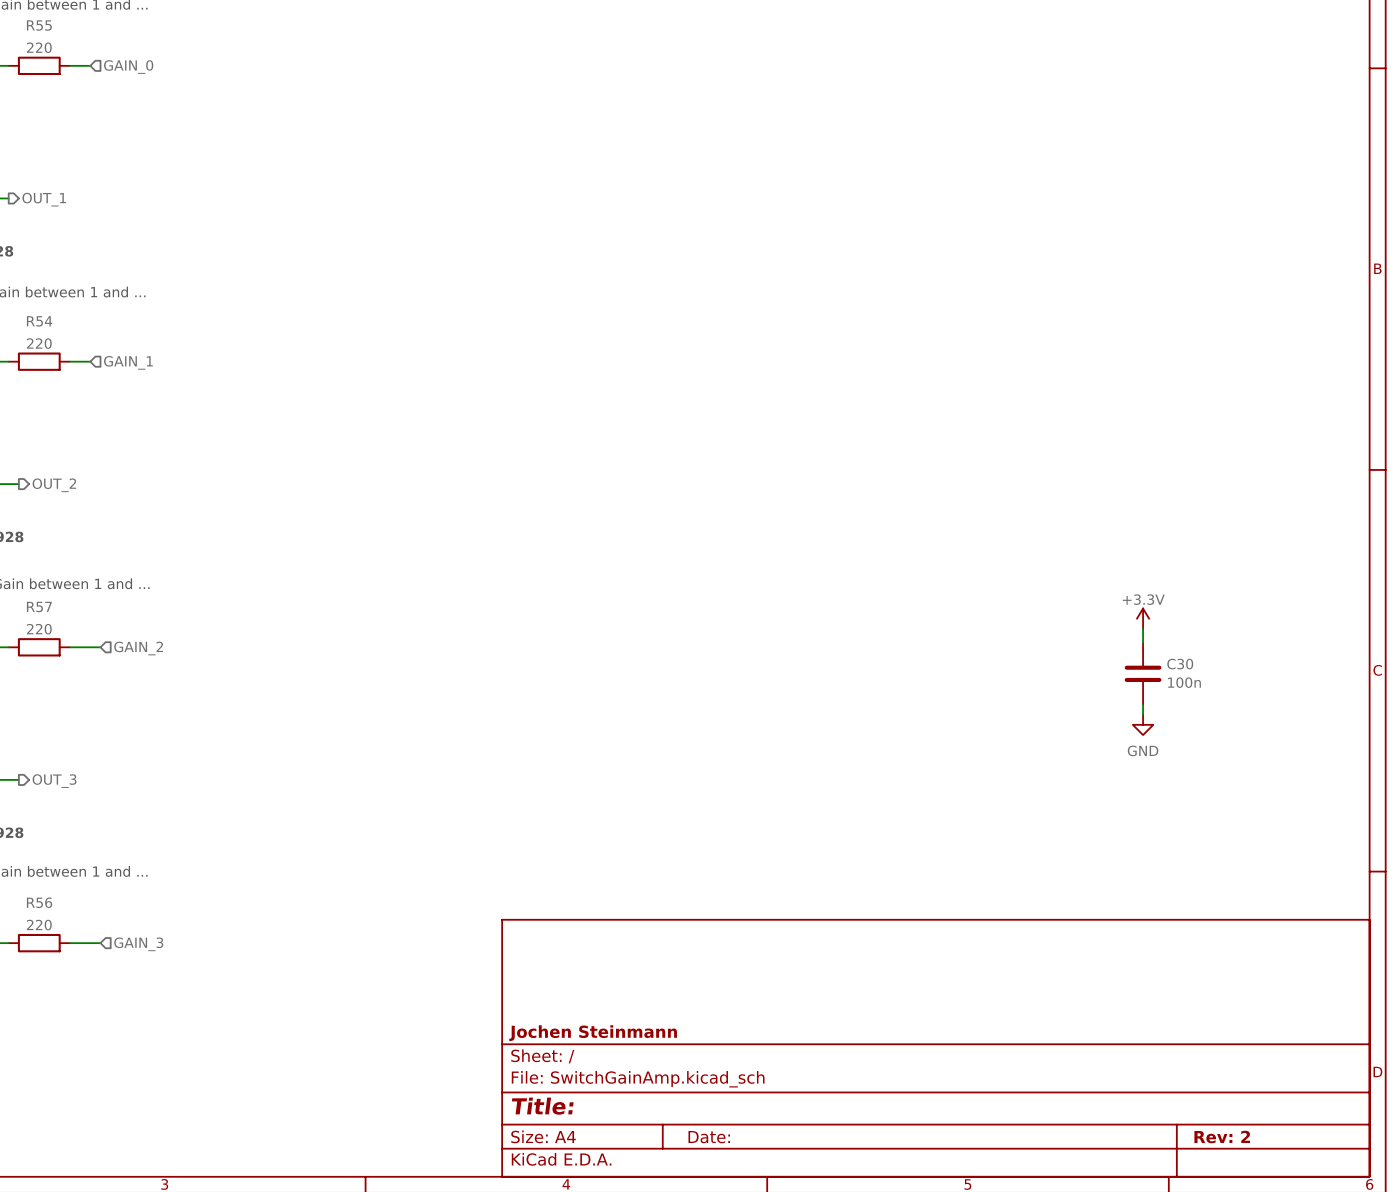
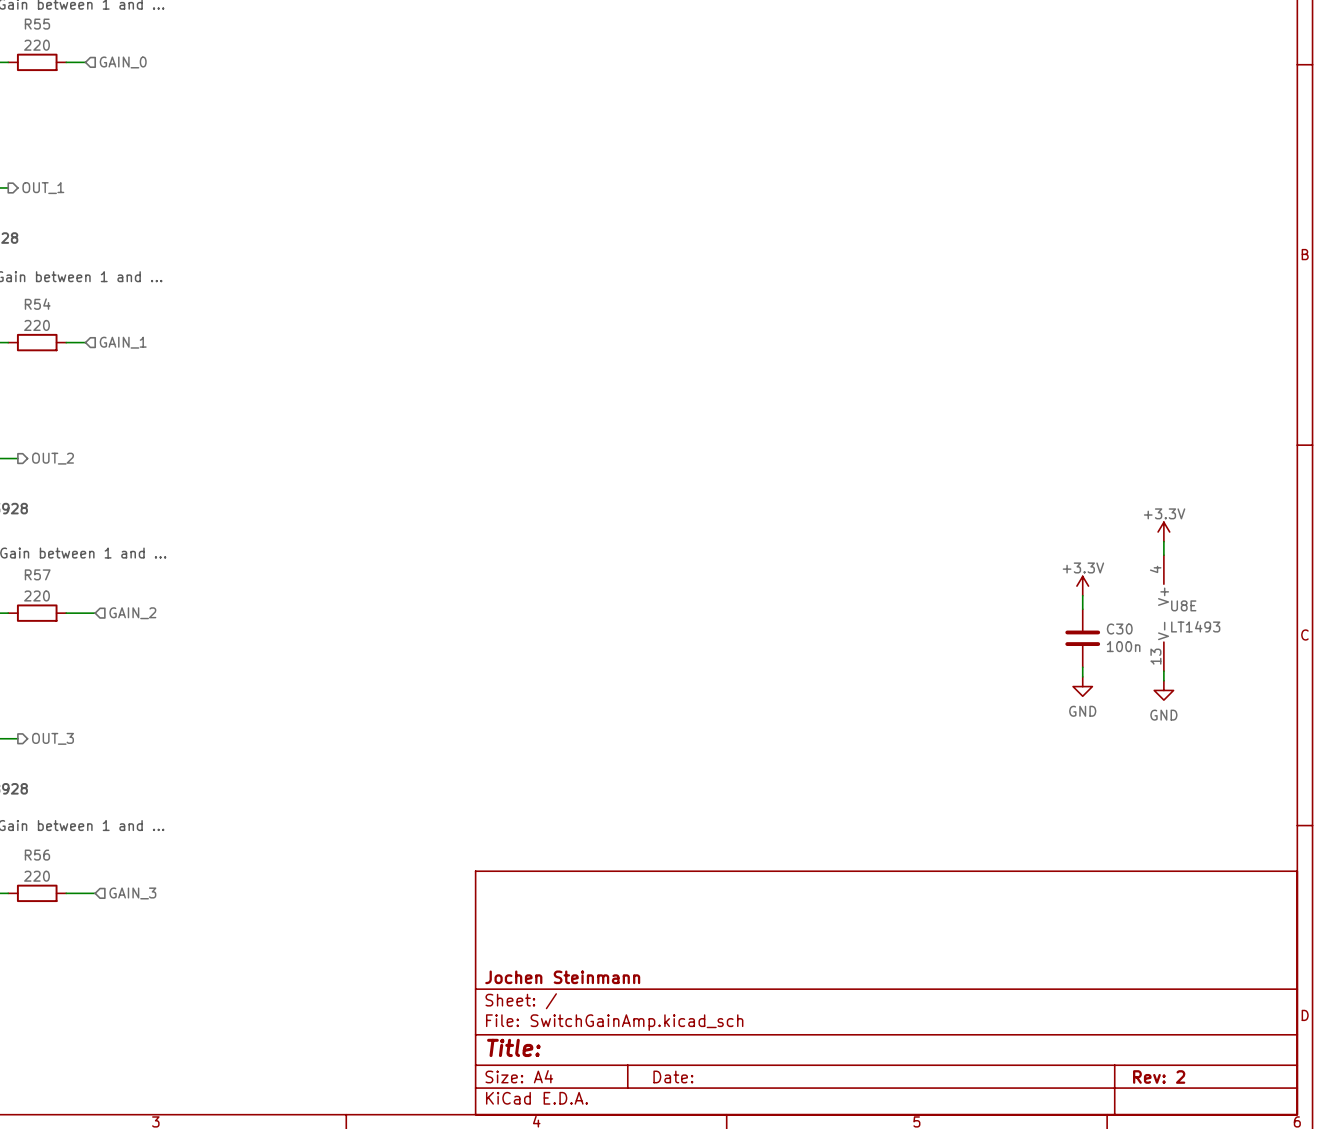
power symbol: none -> +3.3V (1163, 531)
wire: none -> (1163, 541) (1163, 555)
U8E: none -> LT1493 (1163, 613)
wire: none -> (1163, 671) (1163, 680)
power symbol: none -> GND (1163, 690)

